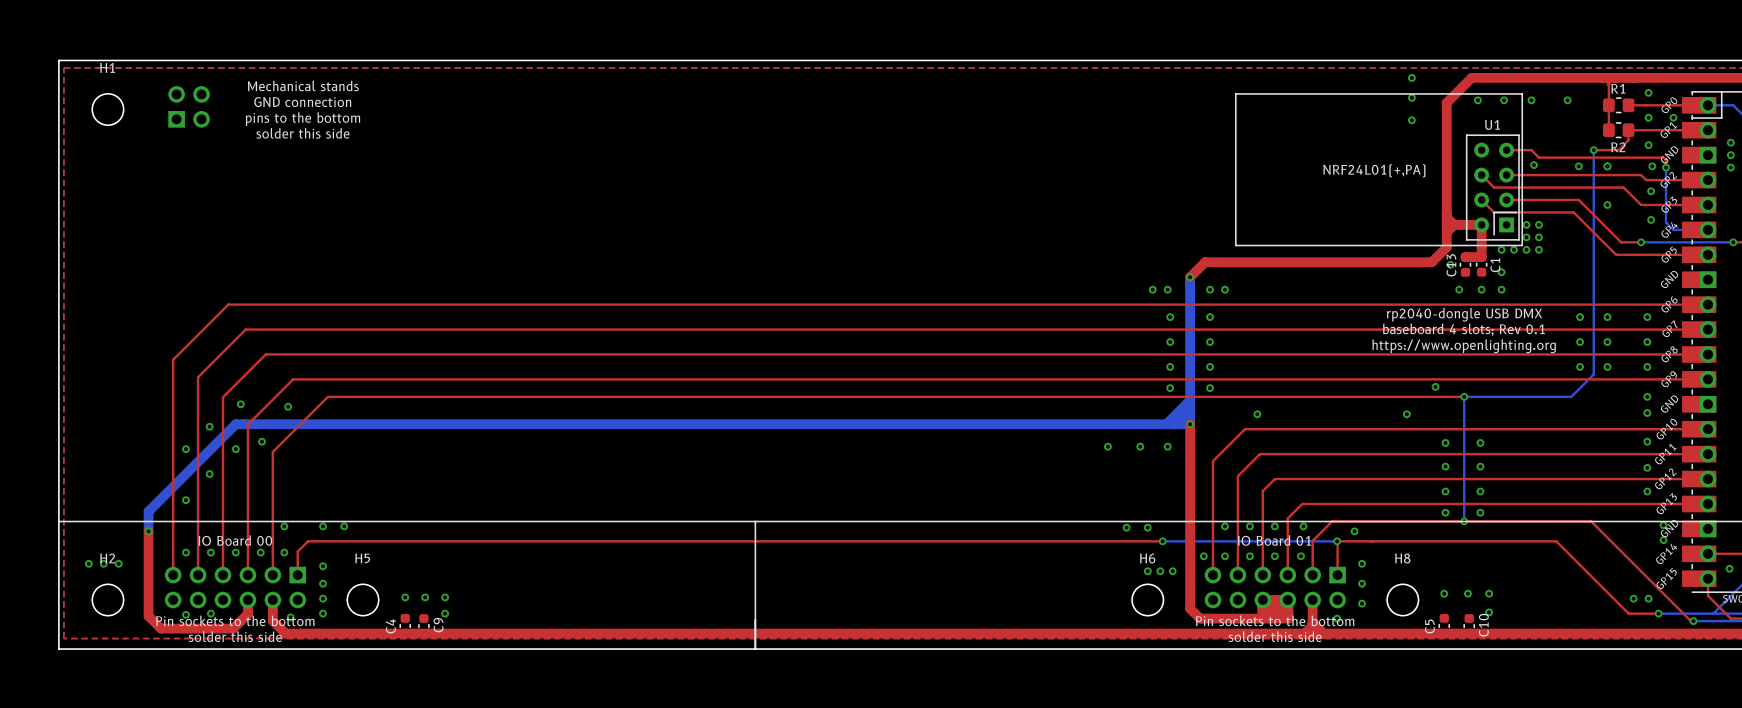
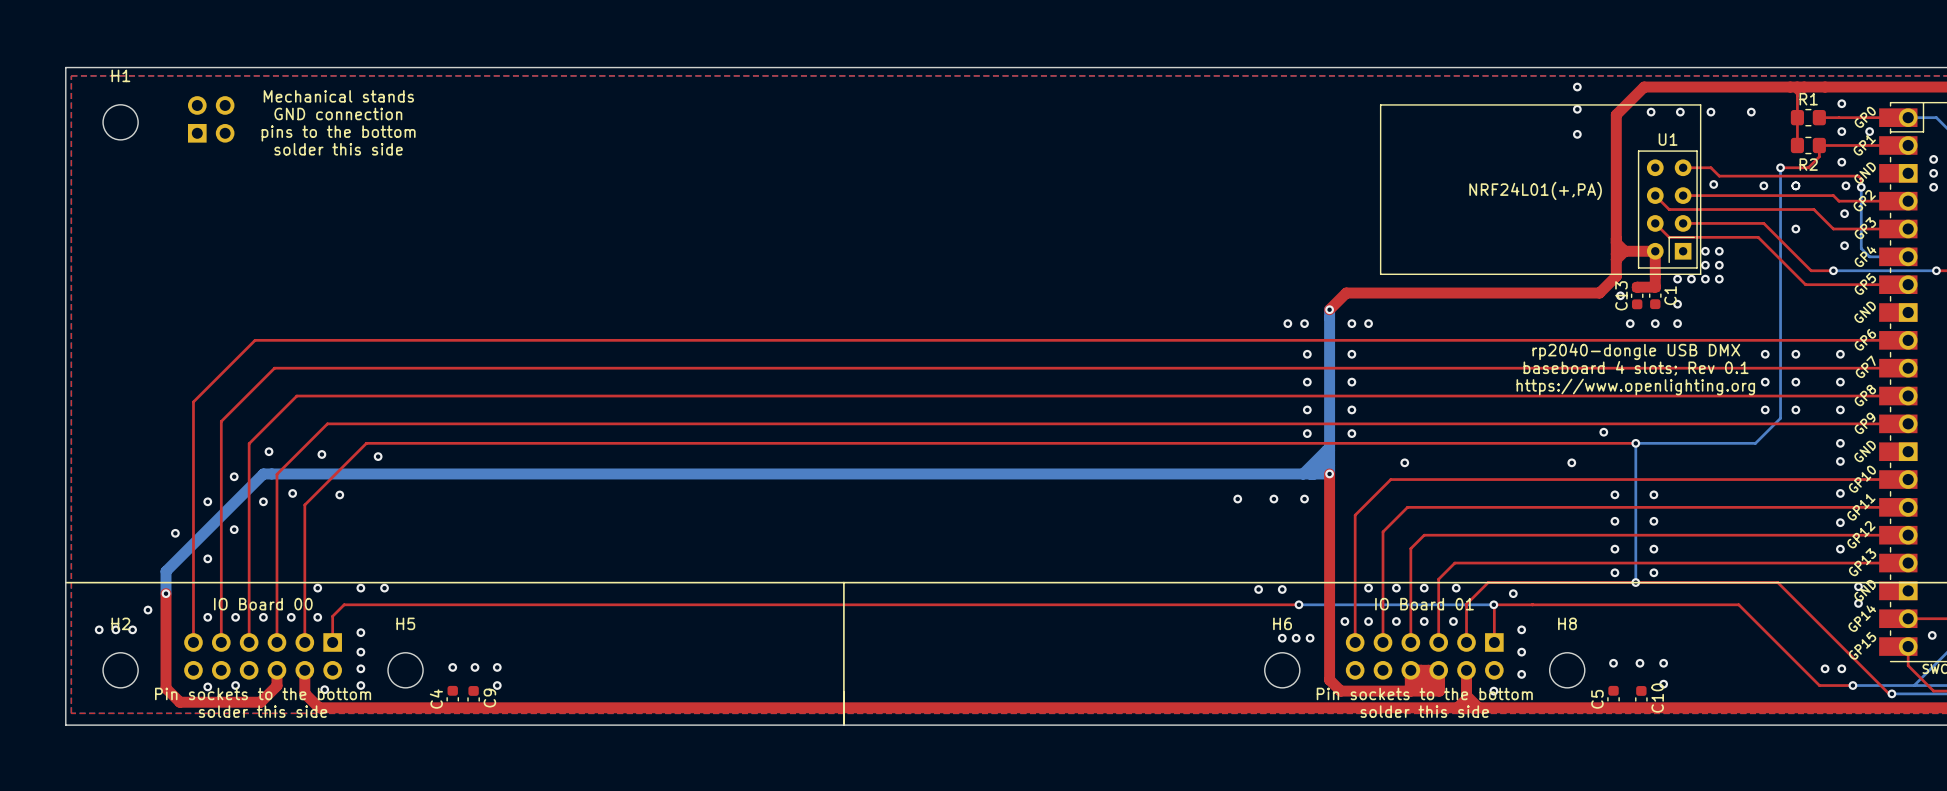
via: none -> (378, 456)
via: none -> (339, 494)
via: none -> (175, 533)
via: none -> (147, 610)

